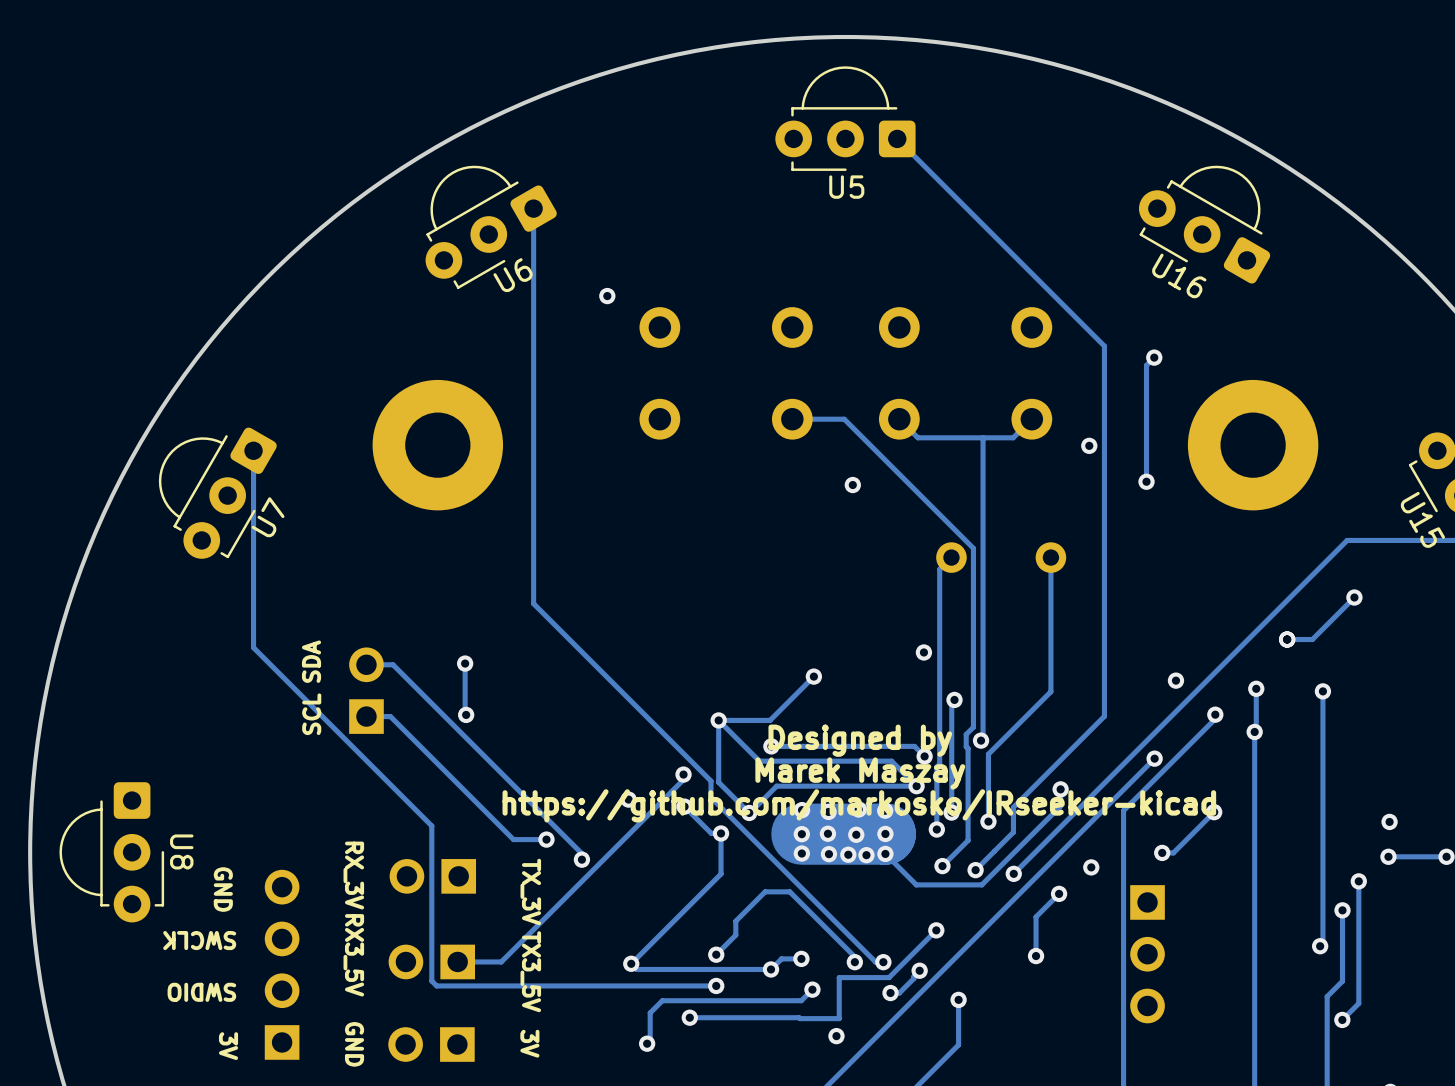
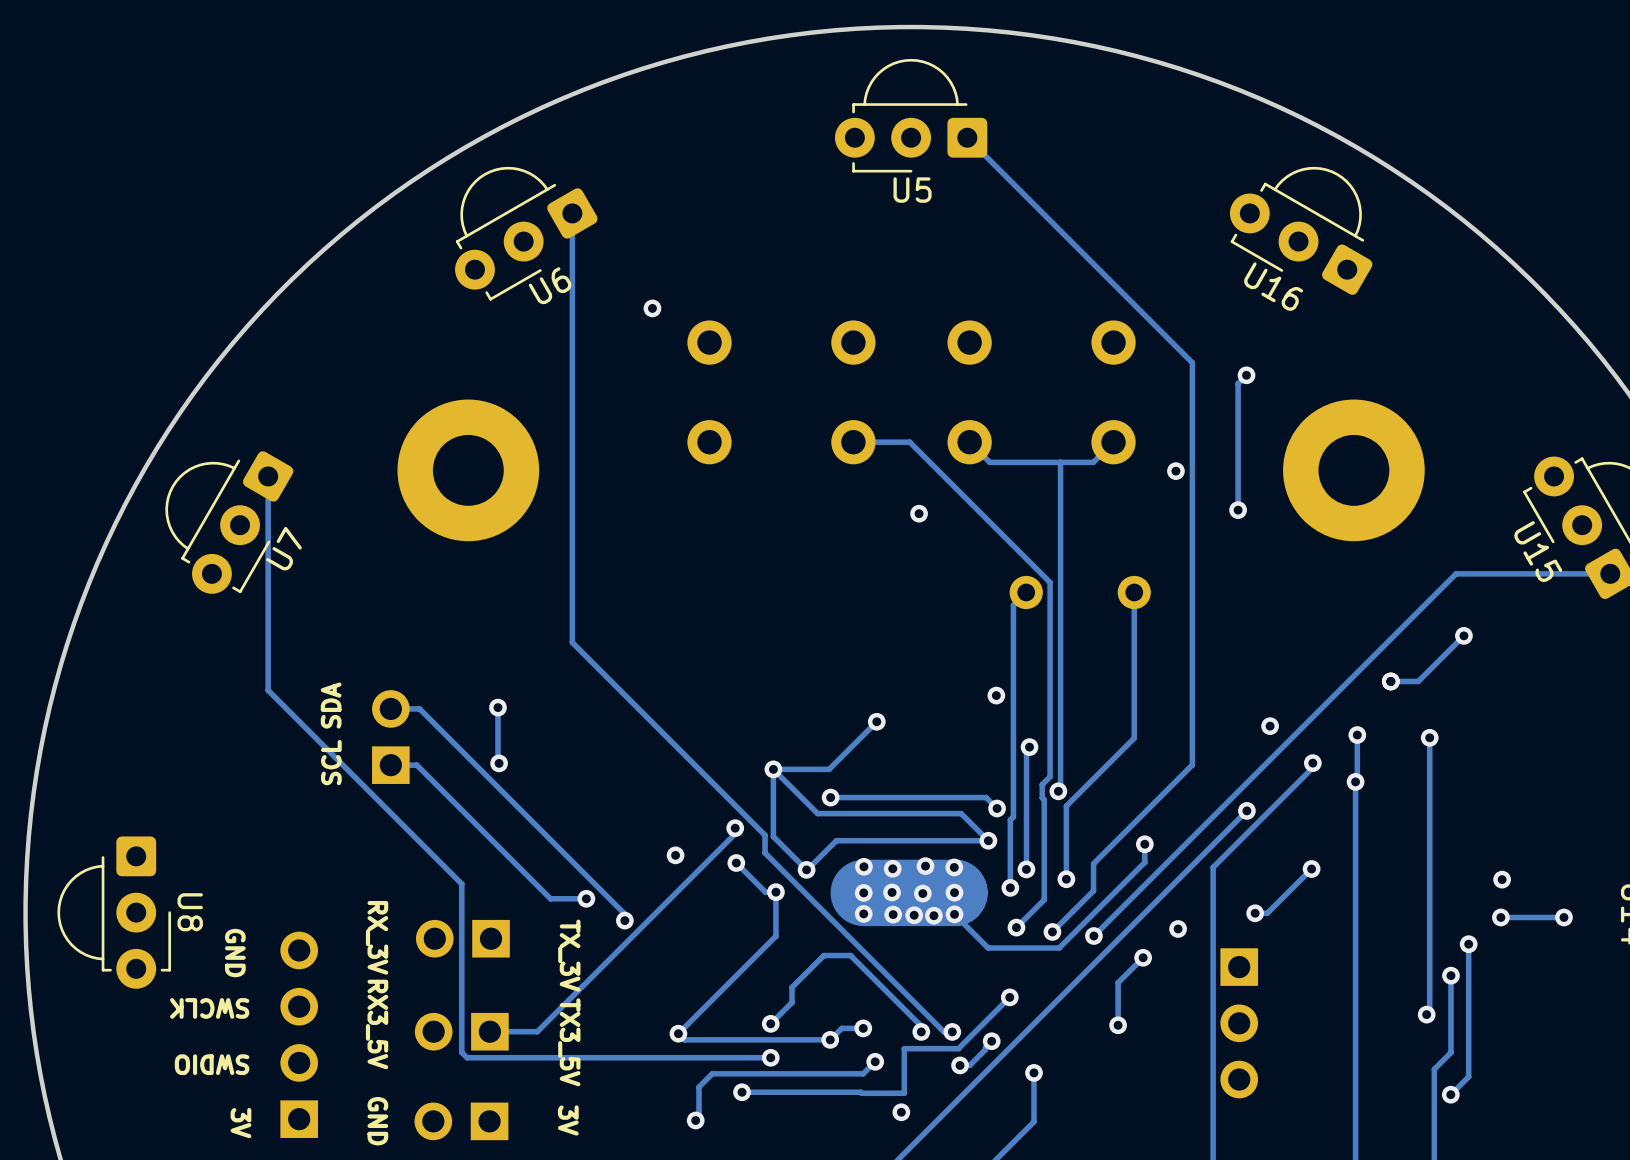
text: Designed by (860, 740) -> none
text: Marek Maszay (860, 773) -> none
text: https://github.com/markosko/IRseeker-kicad (859, 805) -> none

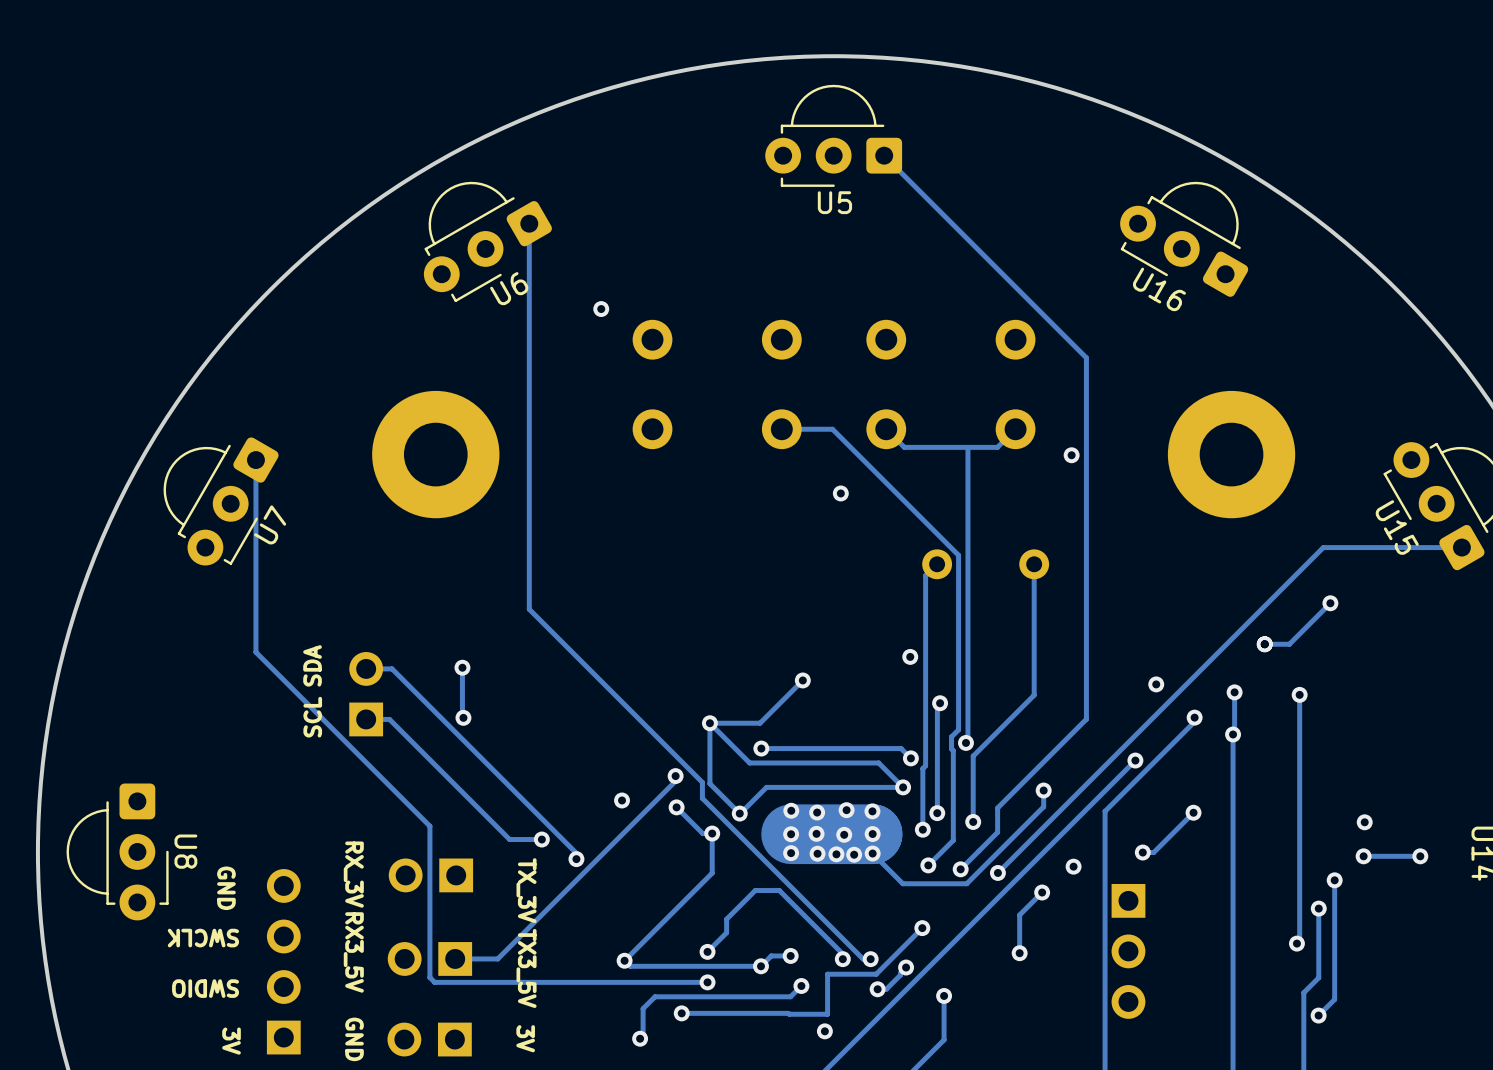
track: (1246, 375) (1238, 383) (1238, 510) -> none
via: (1246, 375) -> none
via: (1238, 510) -> none

